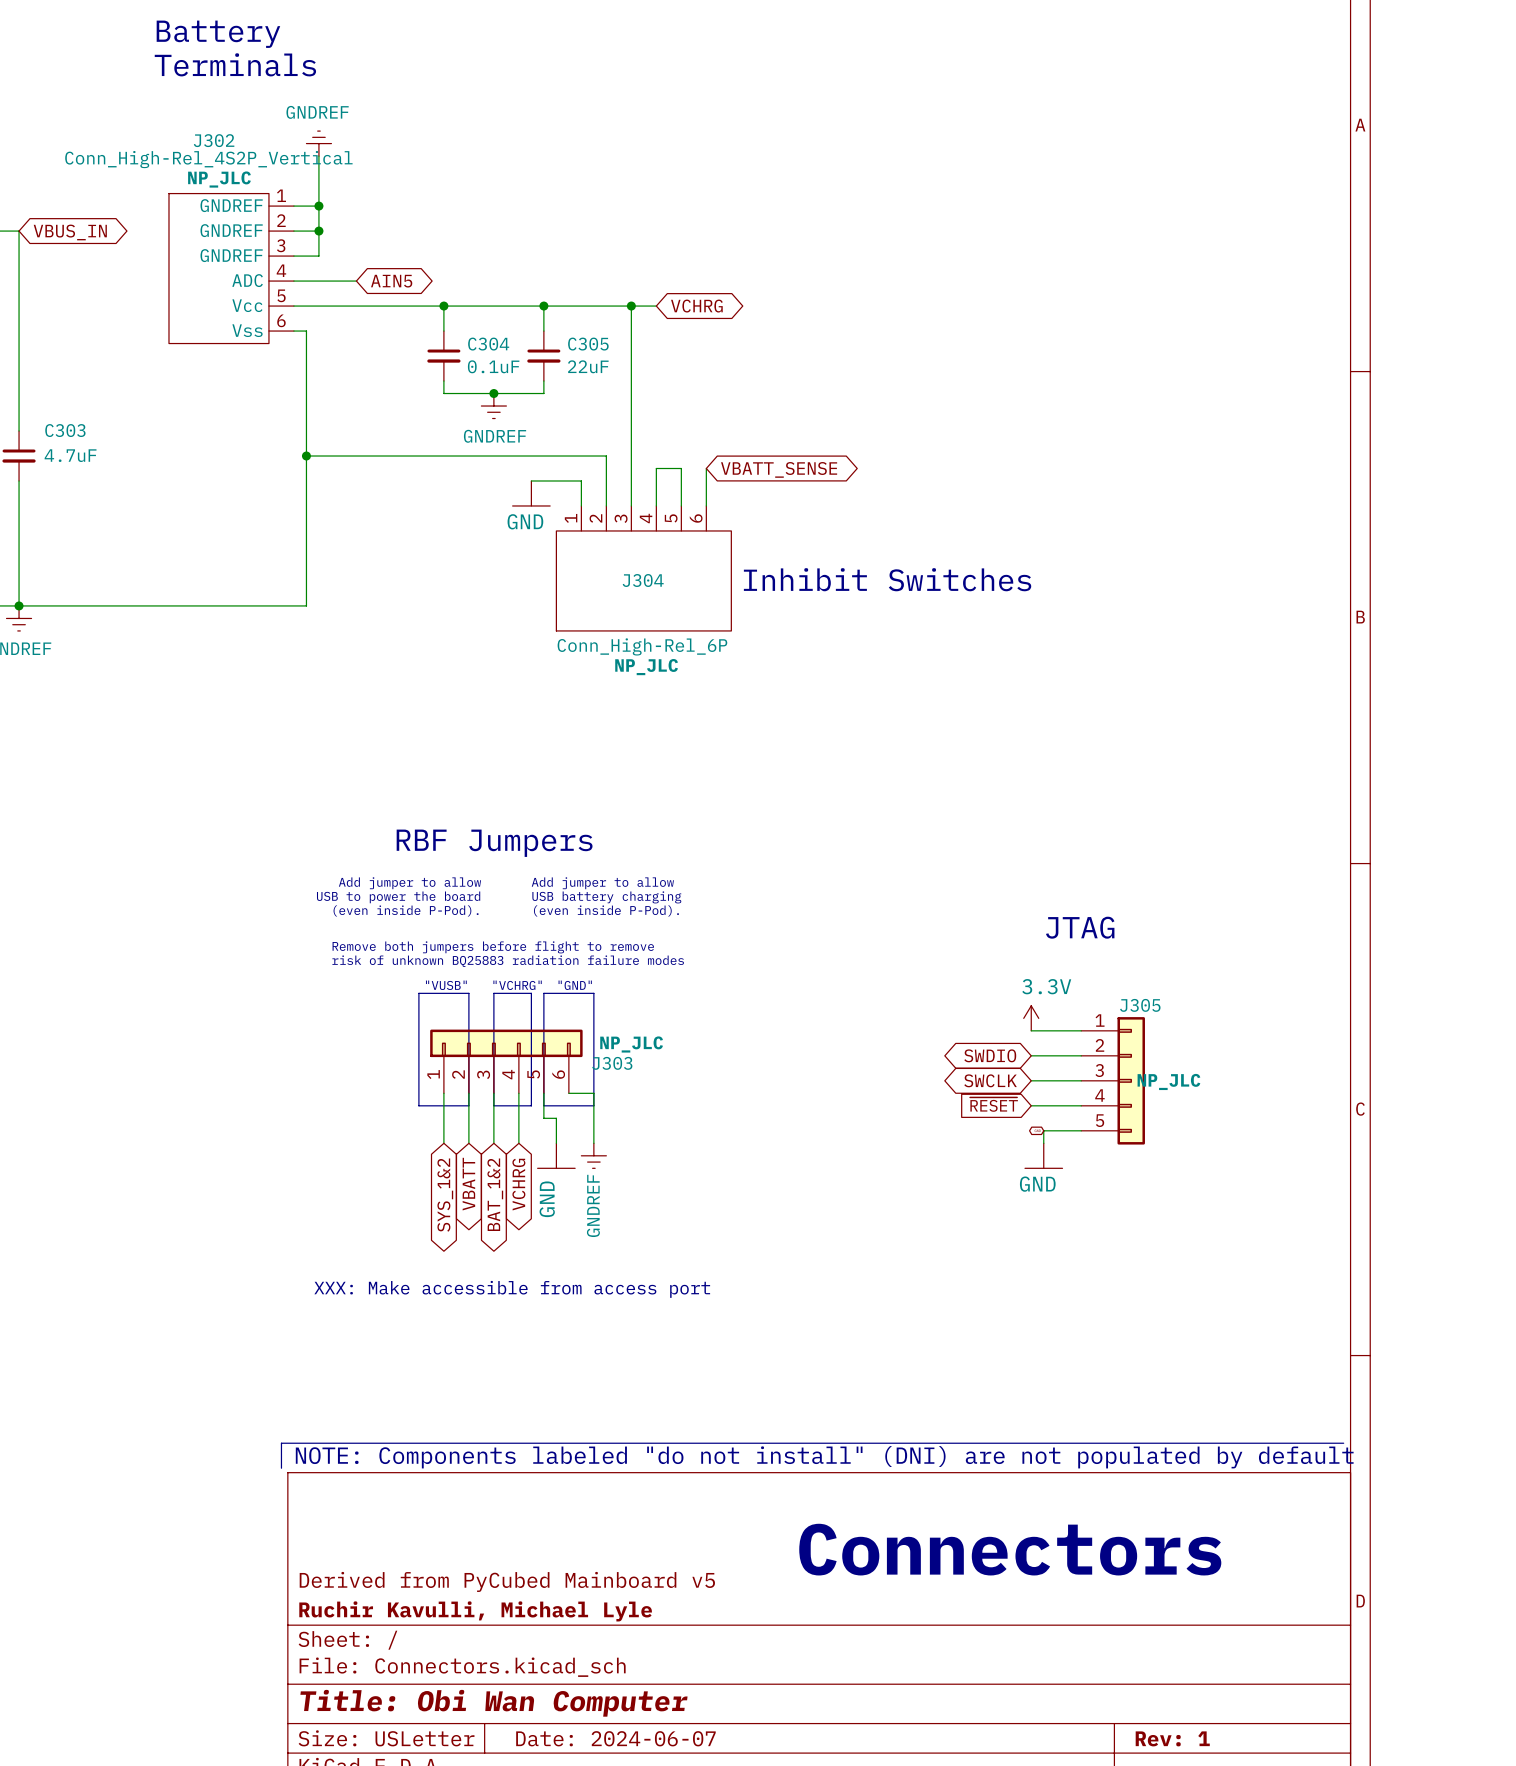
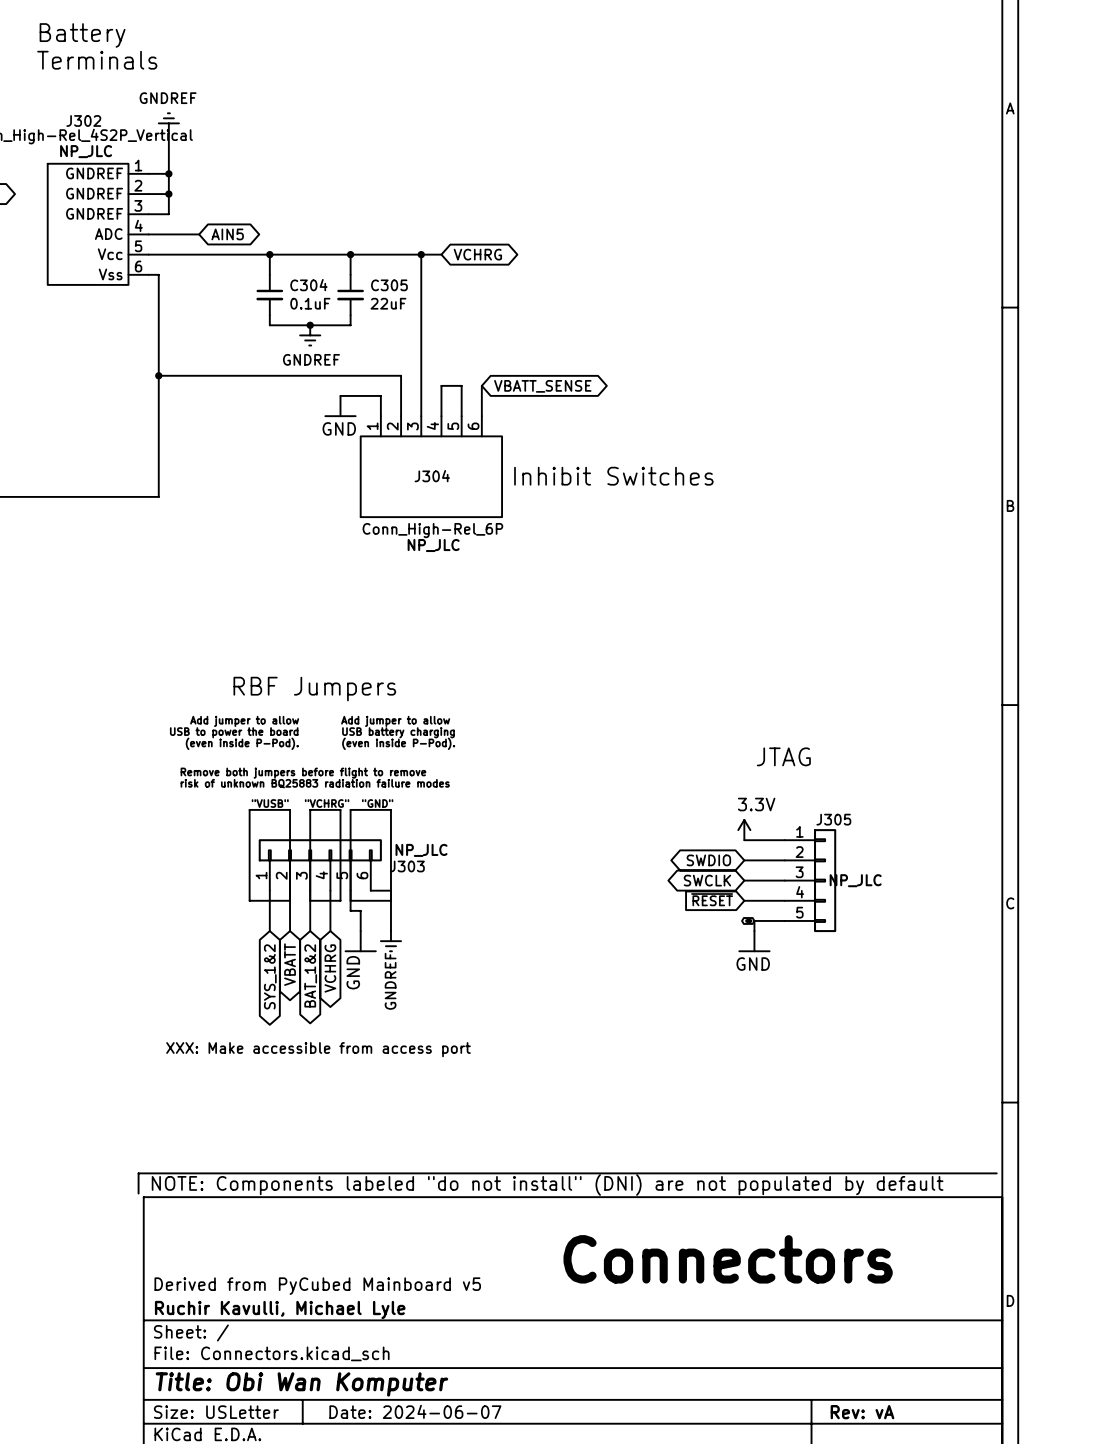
title block: Title: Obi Wan Computer (493, 1703) -> Title: Obi Wan Komputer (301, 1384)
title block: Rev: 1 (1172, 1738) -> Rev: vA (862, 1412)

